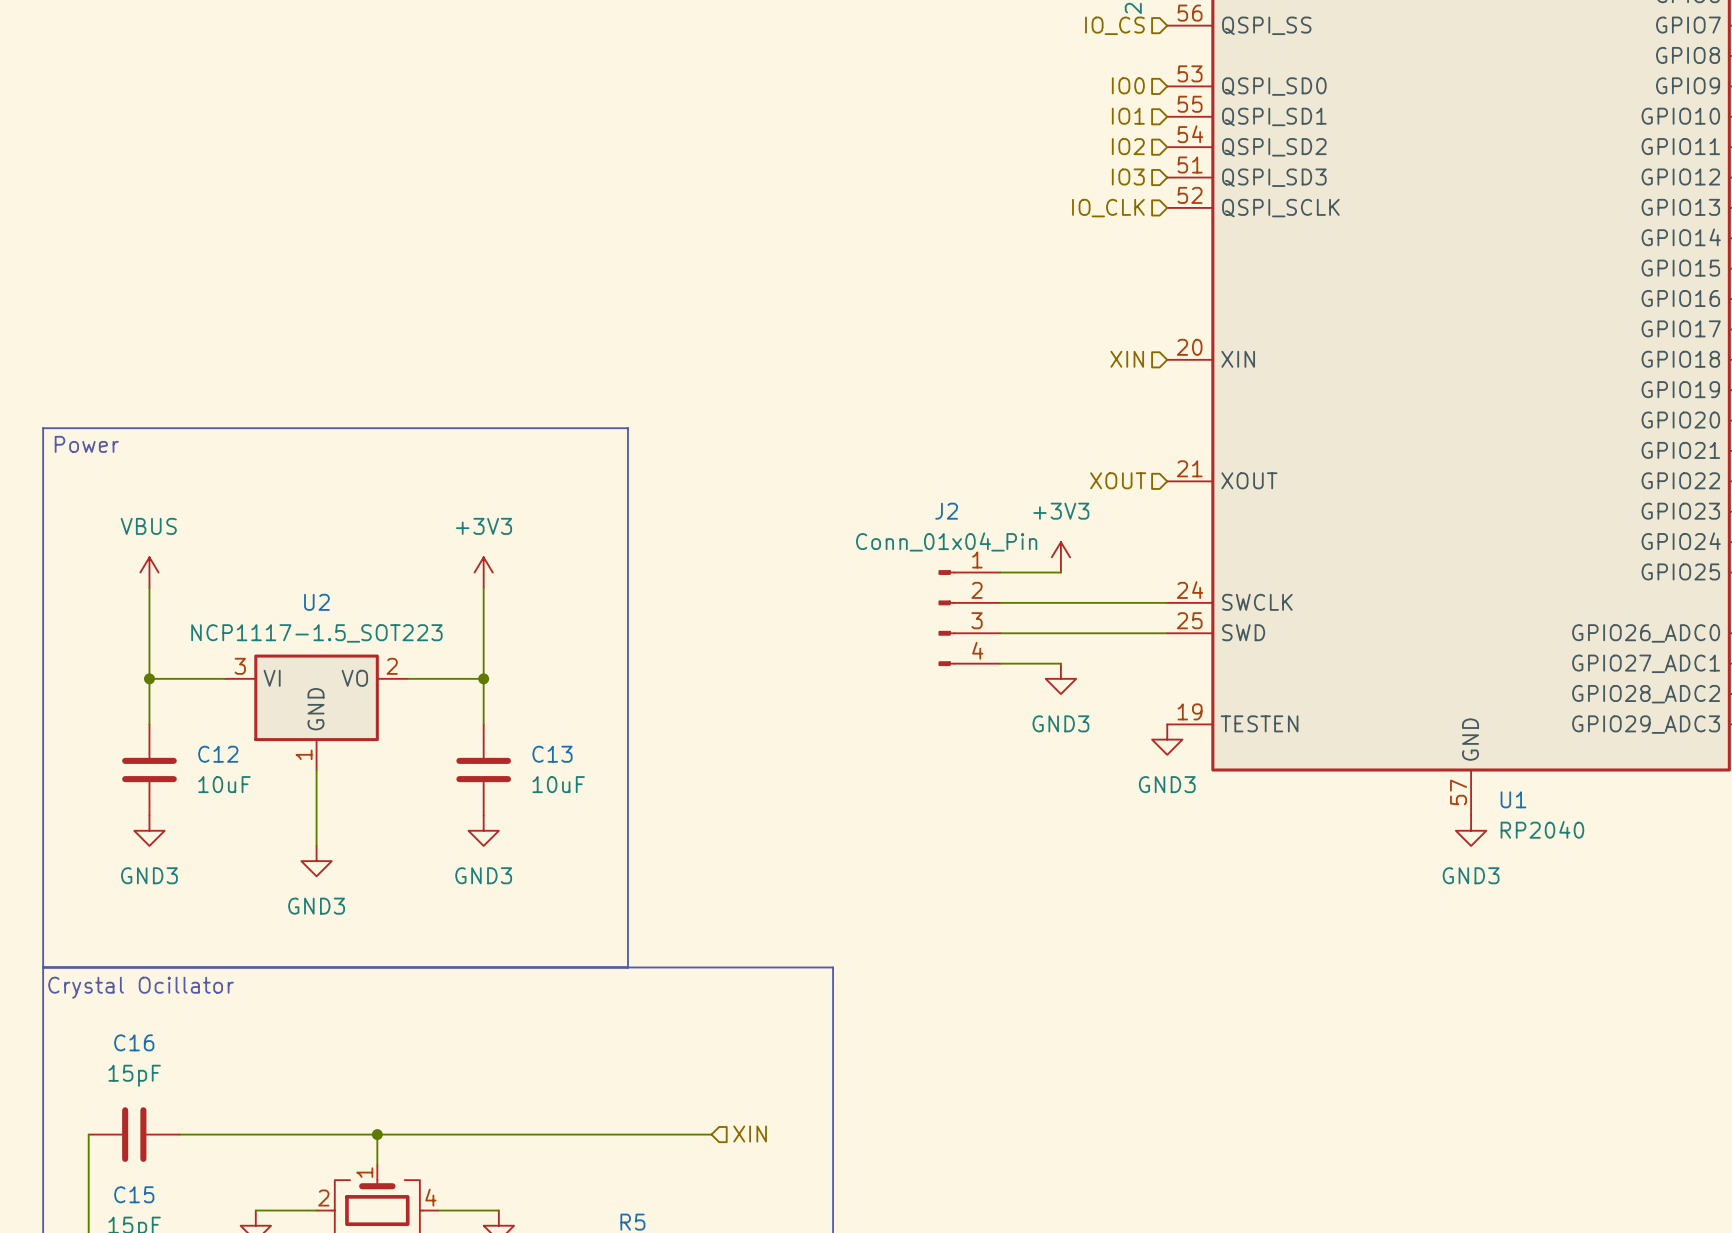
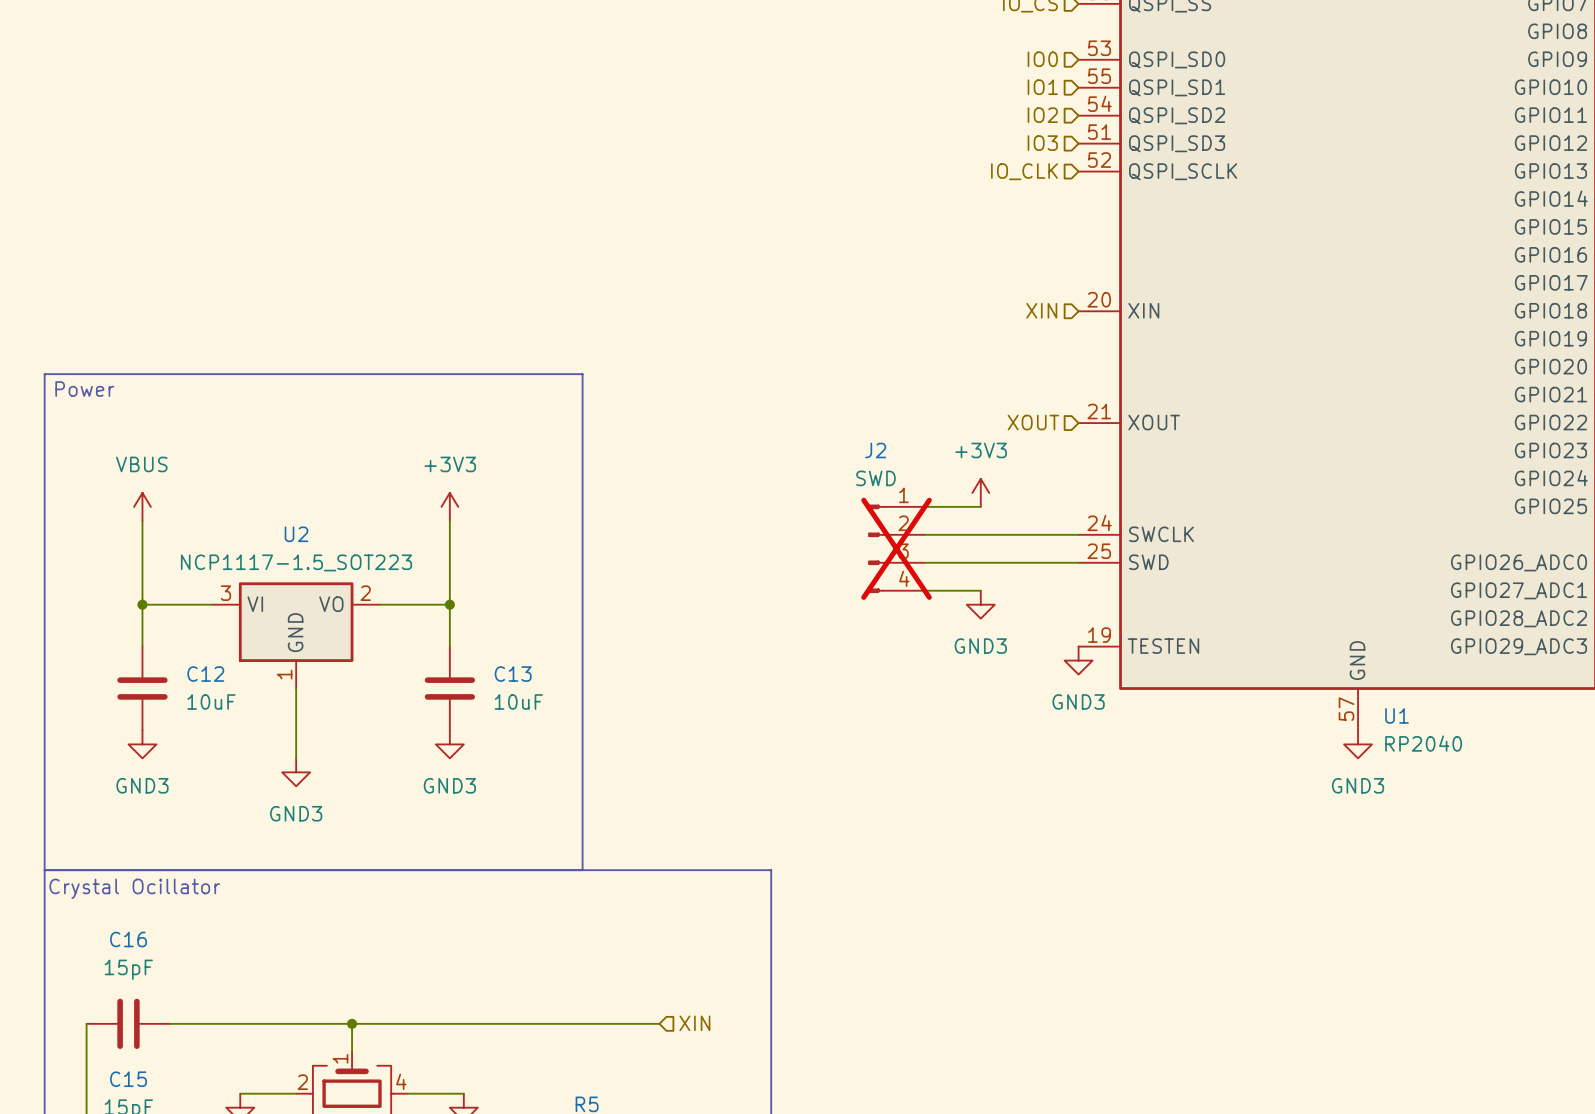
J2 value: Conn_01x04_Pin (946, 541) -> SWD (876, 478)
J2 do-not-place cross: none -> (896, 548)

